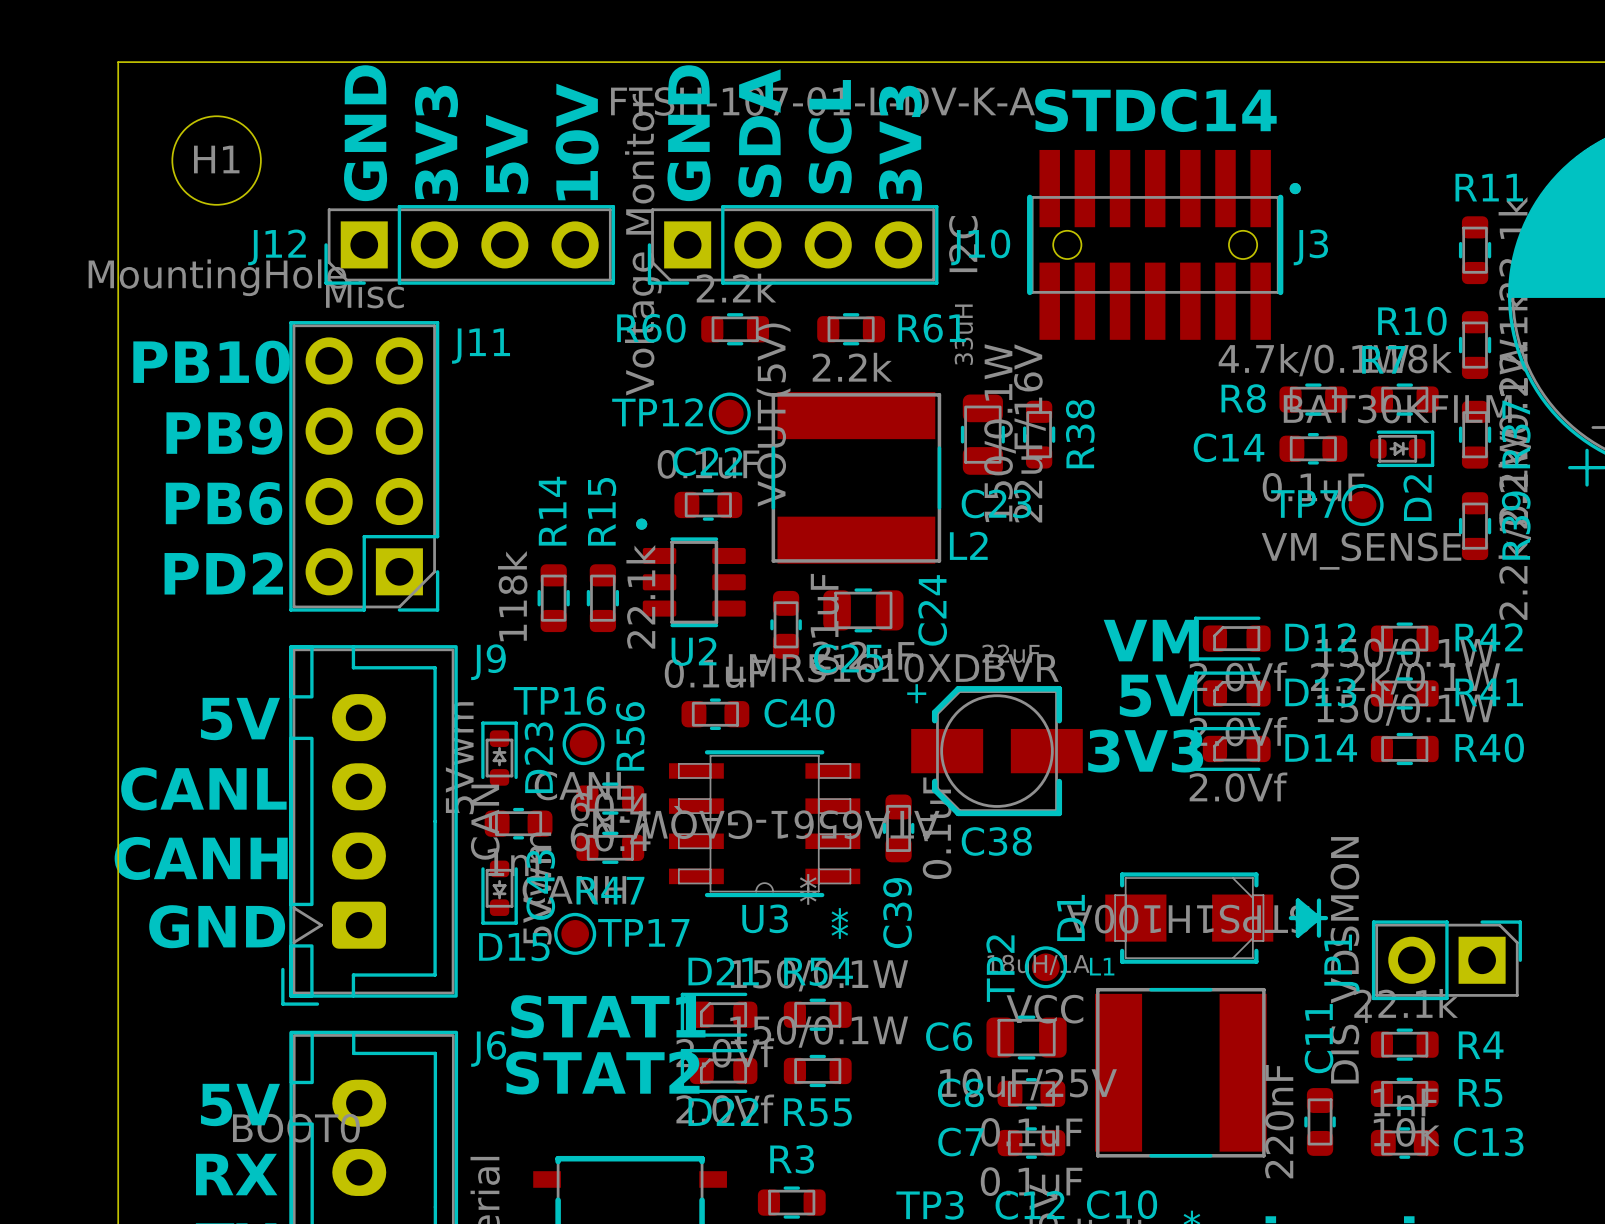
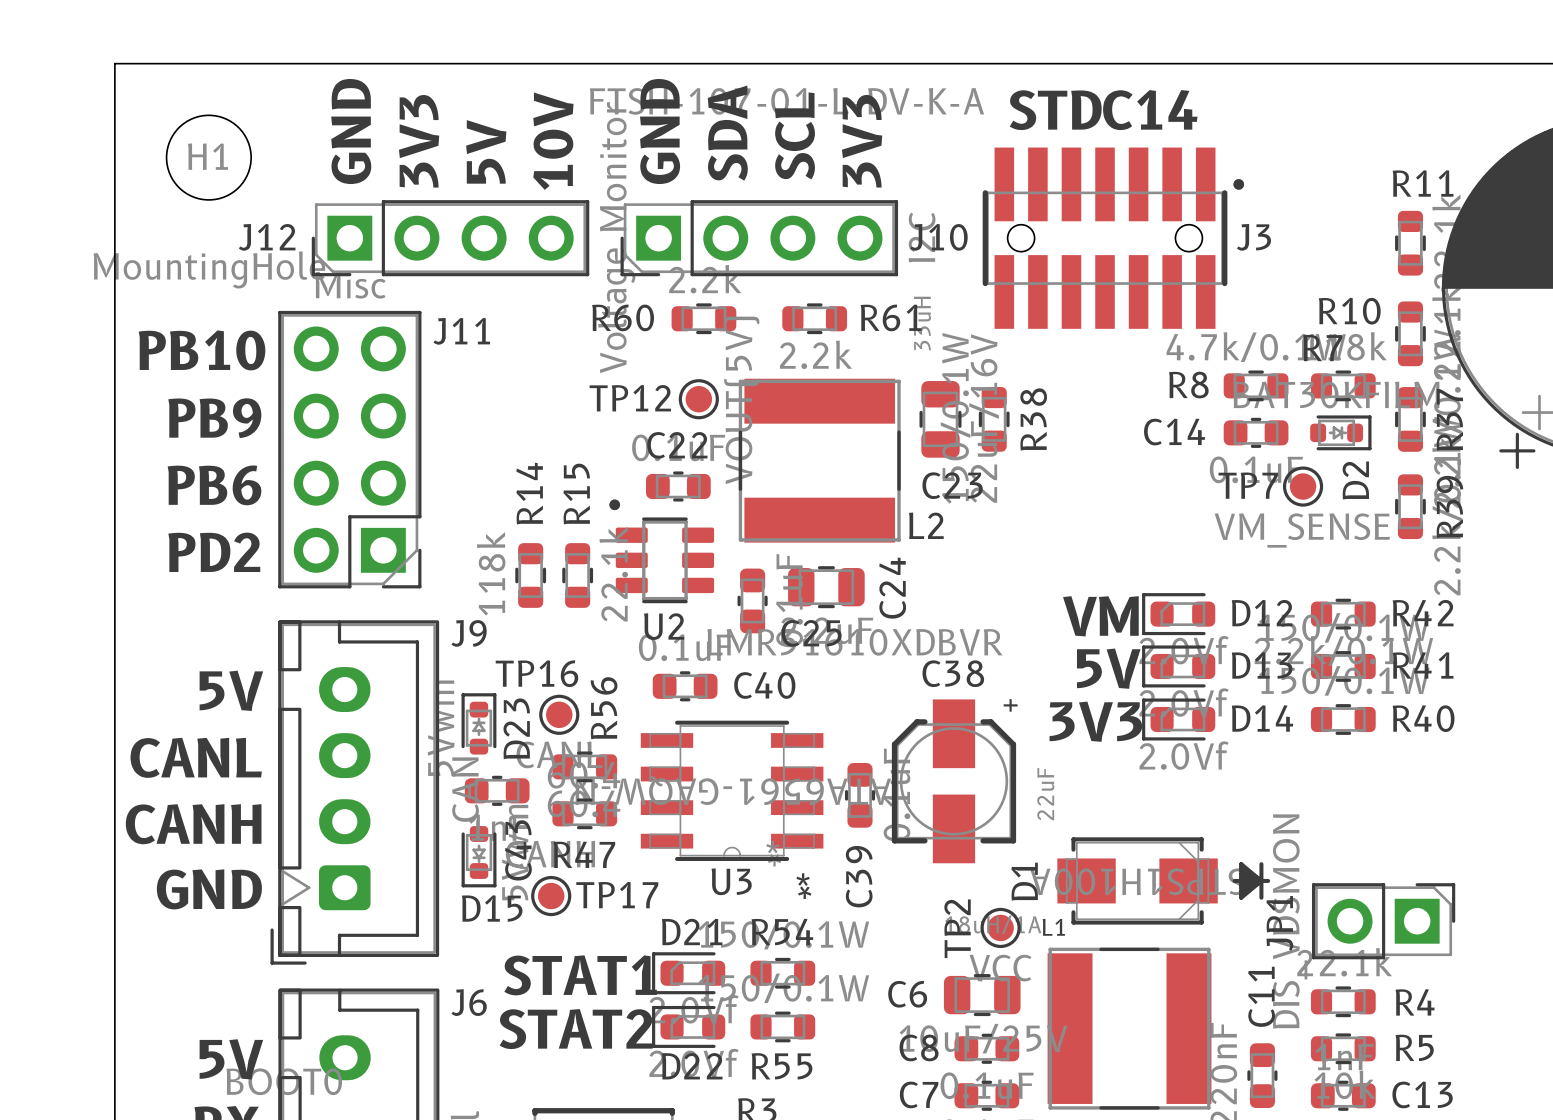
C38 rotation: 0° (997, 751) -> 90° clockwise (953, 781)
C38 name position: C38 (996, 841) -> C38 (953, 673)

